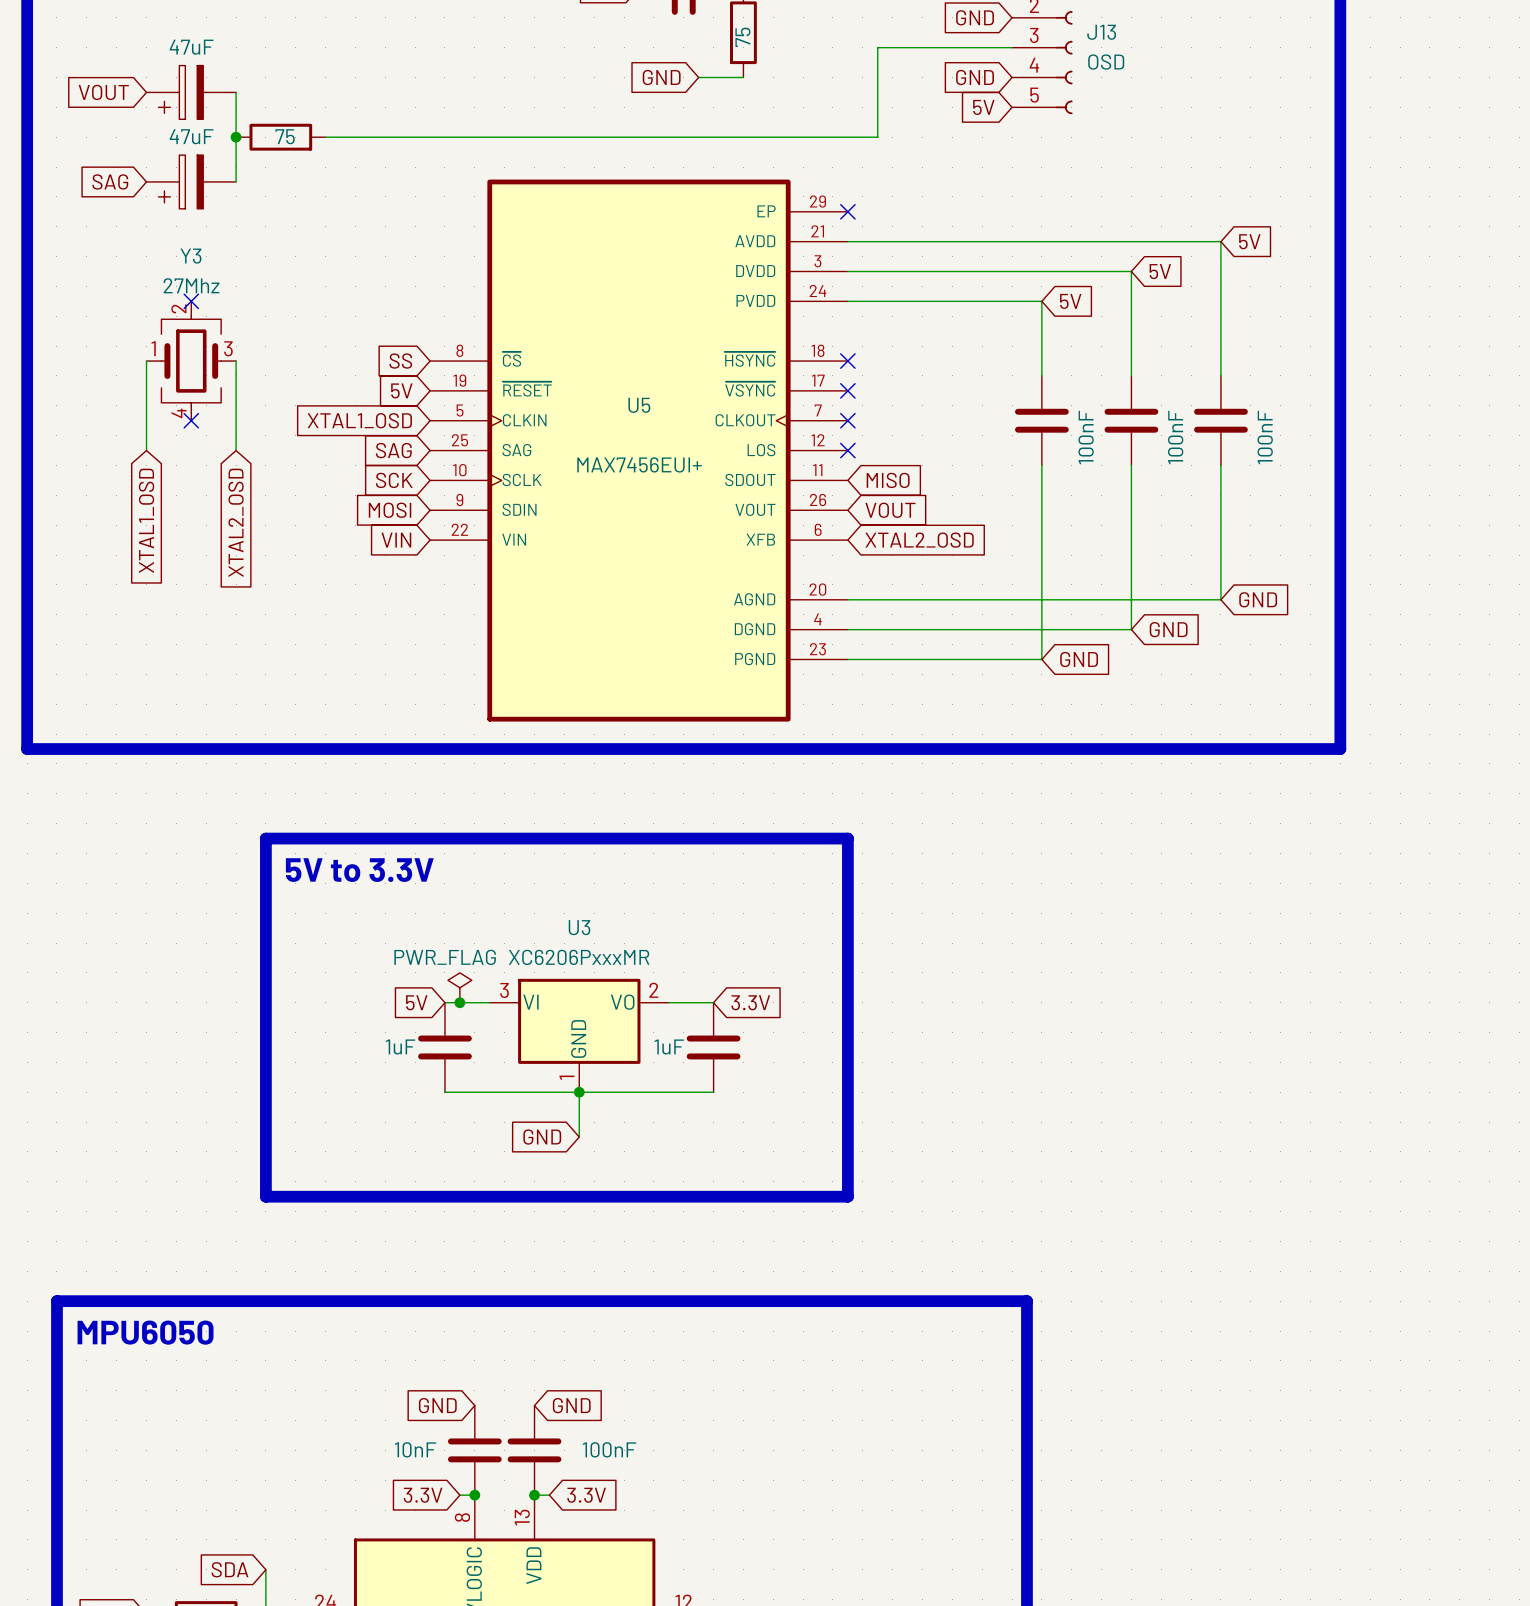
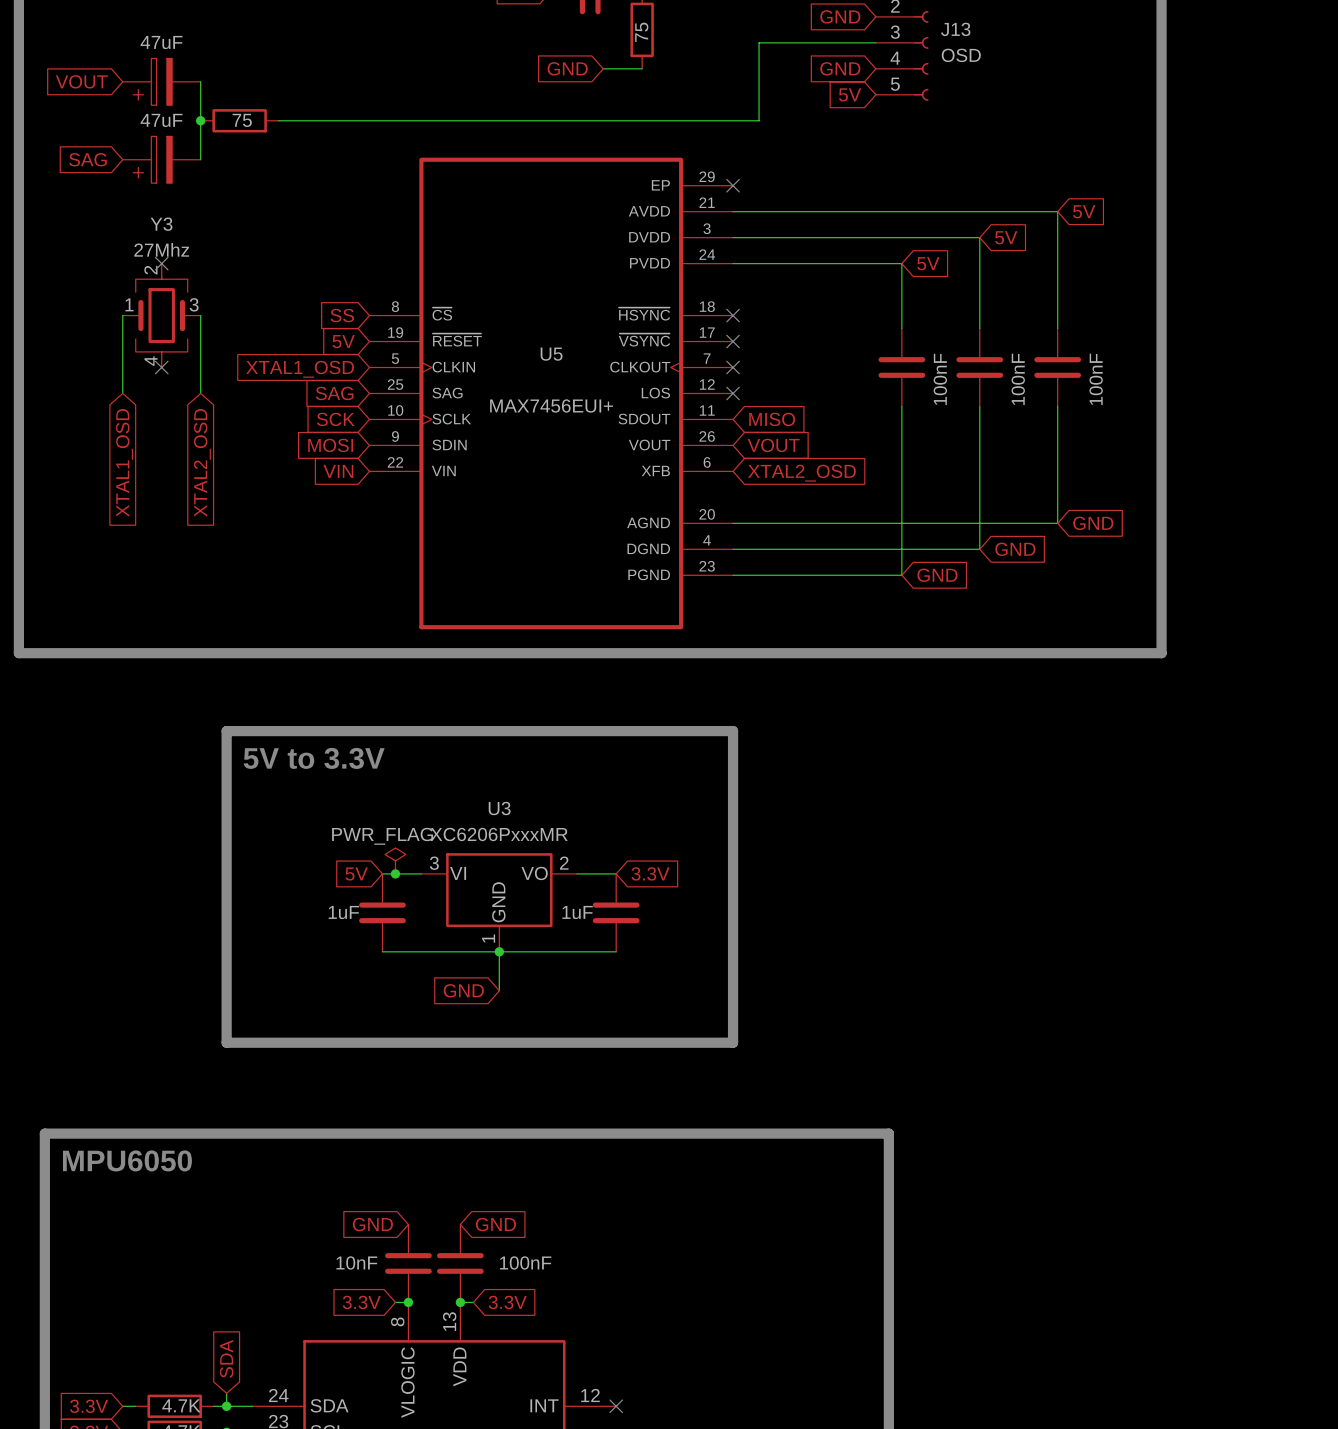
global label rotation: 0° (230, 1569) -> 90° clockwise (226, 1358)
wire: (265, 1569) (265, 1599) -> none

